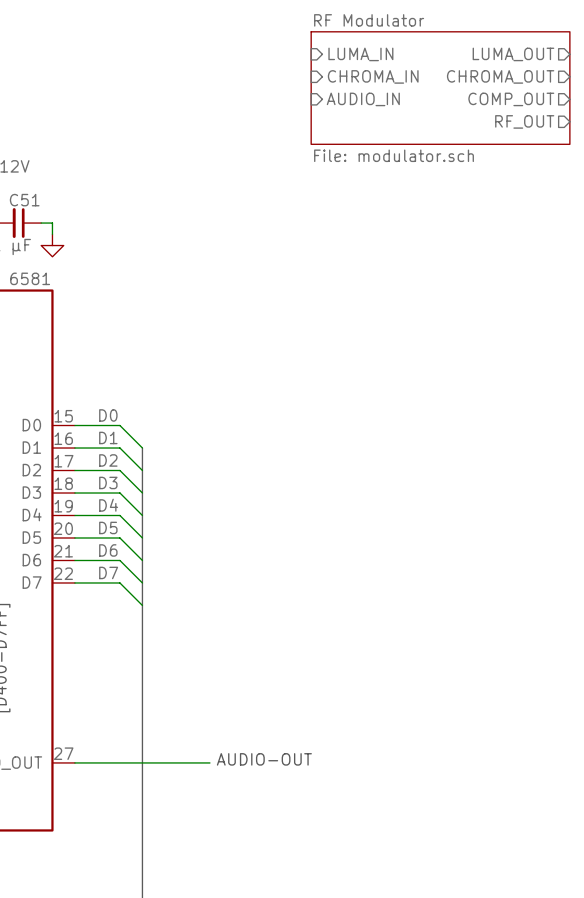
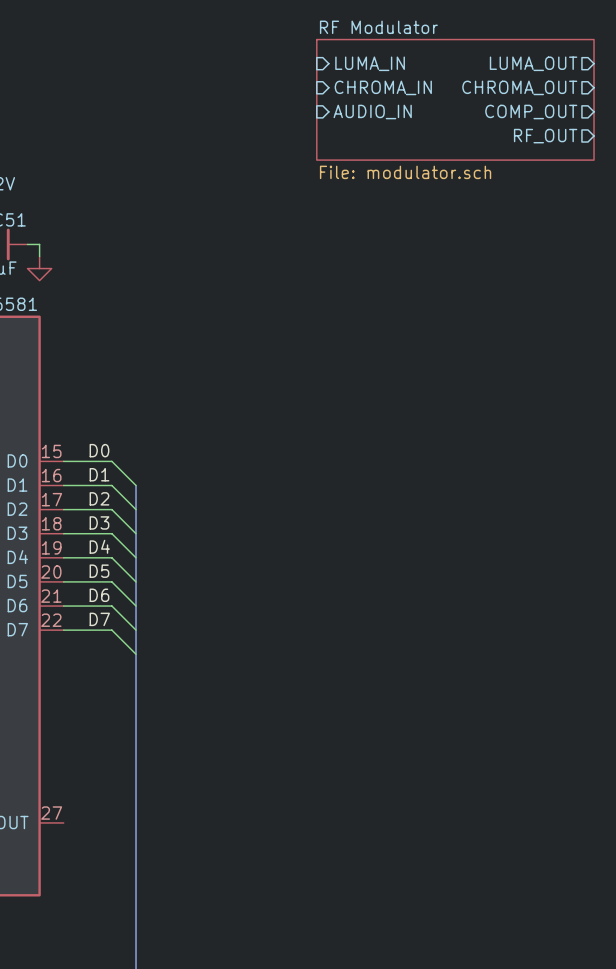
text: AUDIO-OUT (264, 759) -> none
wire: (74, 762) (209, 762) -> none

